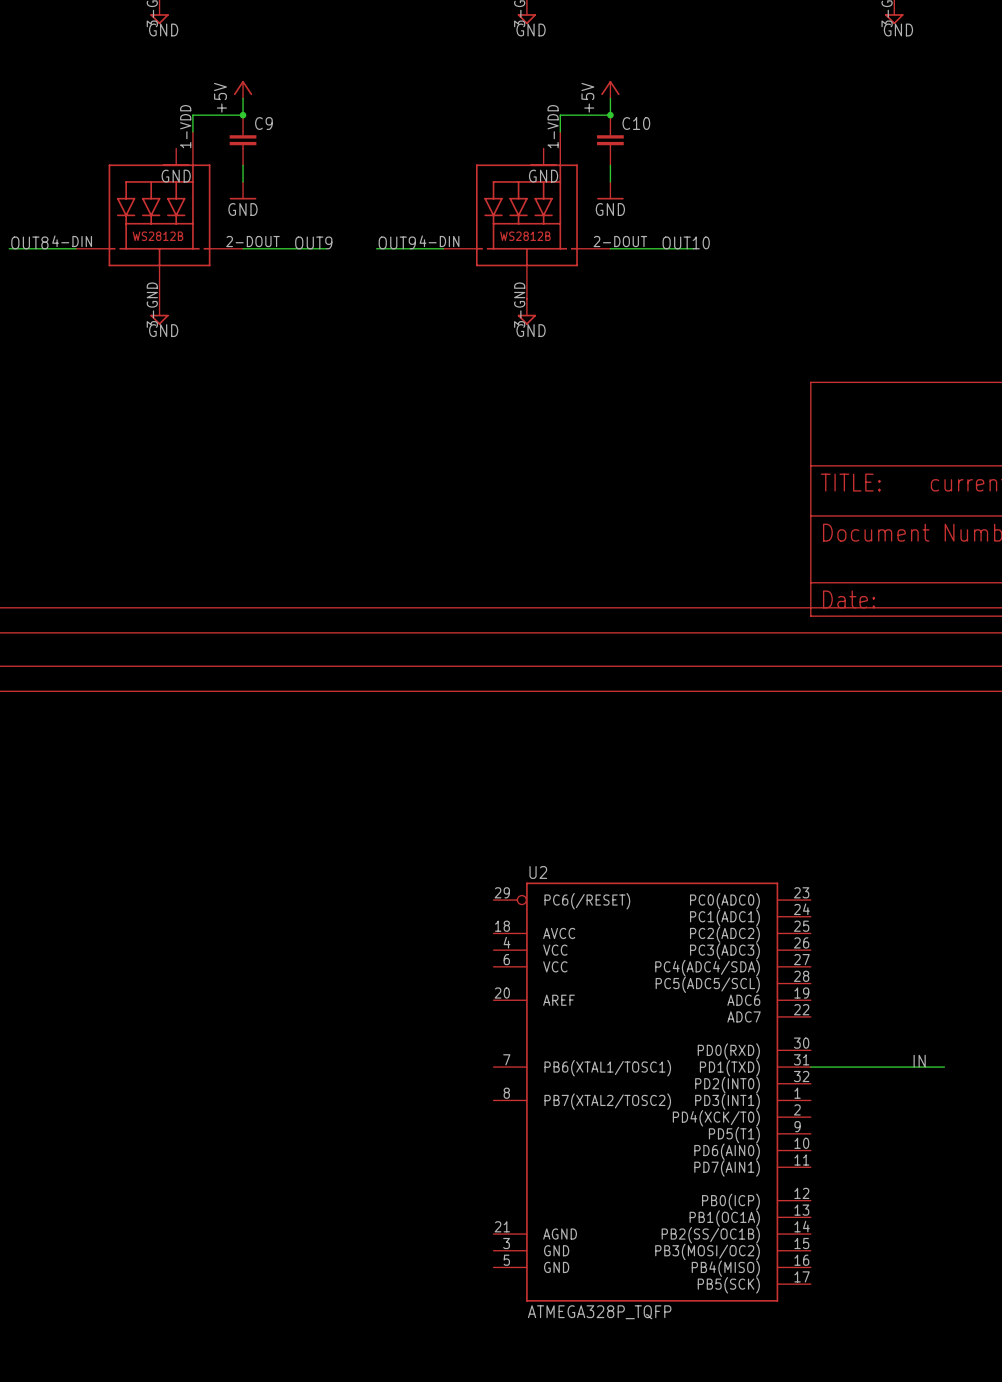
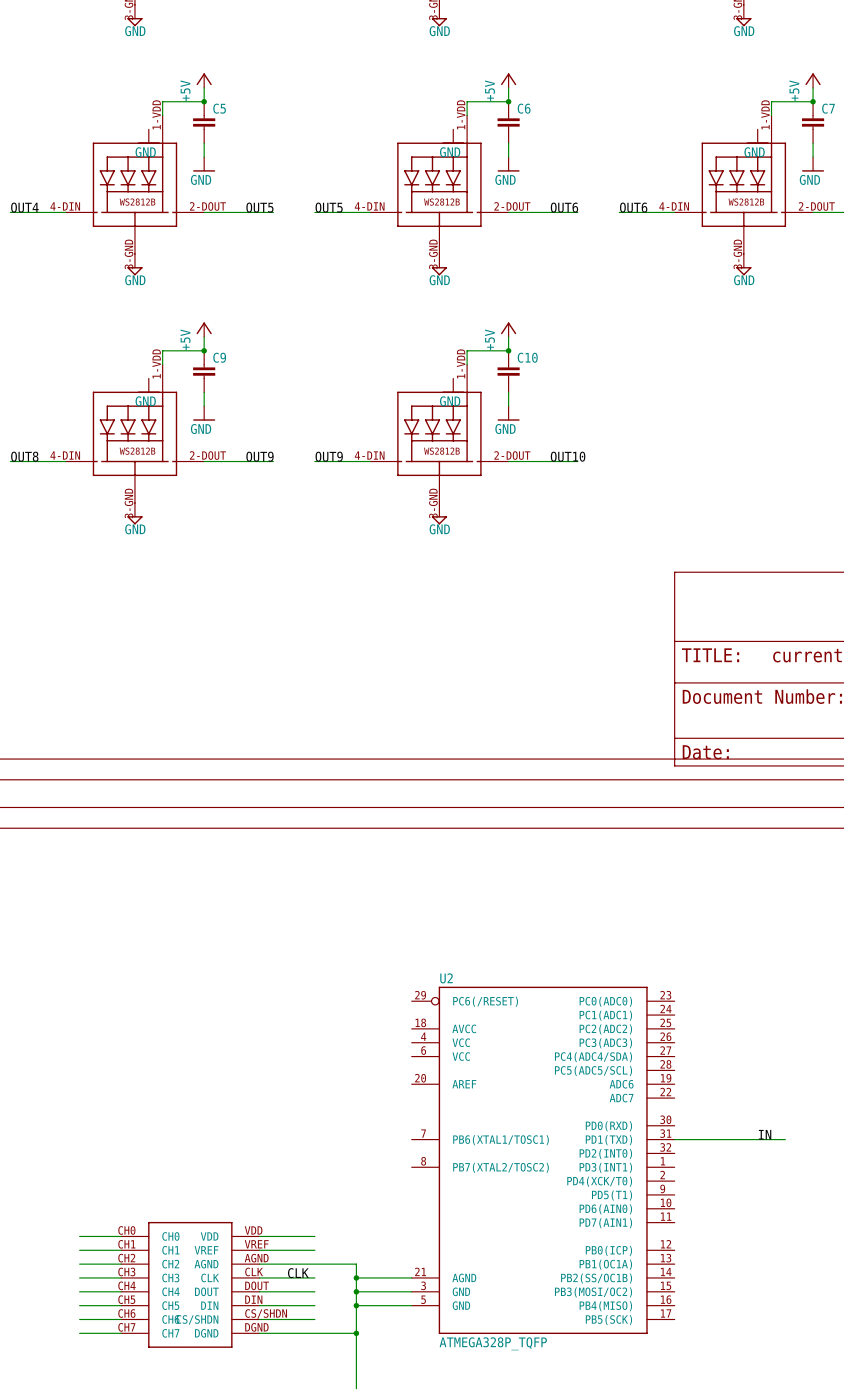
wire: none -> (79, 1236) (121, 1236)
wire: none -> (259, 1236) (314, 1236)
wire: none -> (79, 1250) (121, 1250)
wire: none -> (259, 1250) (314, 1250)
wire: none -> (79, 1264) (121, 1264)
wire: none -> (259, 1264) (356, 1264) (356, 1388)
label: none -> CLK (298, 1273)
wire: none -> (79, 1277) (121, 1277)
wire: none -> (259, 1277) (314, 1277)
wire: none -> (356, 1277) (411, 1277)
junction: none -> (356, 1277)
part: none -> (190, 1284)
wire: none -> (79, 1291) (121, 1291)
wire: none -> (259, 1291) (314, 1291)
wire: none -> (356, 1291) (411, 1291)
junction: none -> (356, 1291)
wire: none -> (79, 1305) (121, 1305)
wire: none -> (259, 1305) (314, 1305)
wire: none -> (356, 1305) (411, 1305)
junction: none -> (356, 1305)
wire: none -> (79, 1319) (121, 1319)
wire: none -> (259, 1319) (314, 1319)
wire: none -> (79, 1333) (121, 1333)
wire: none -> (259, 1333) (356, 1333)
junction: none -> (356, 1333)

